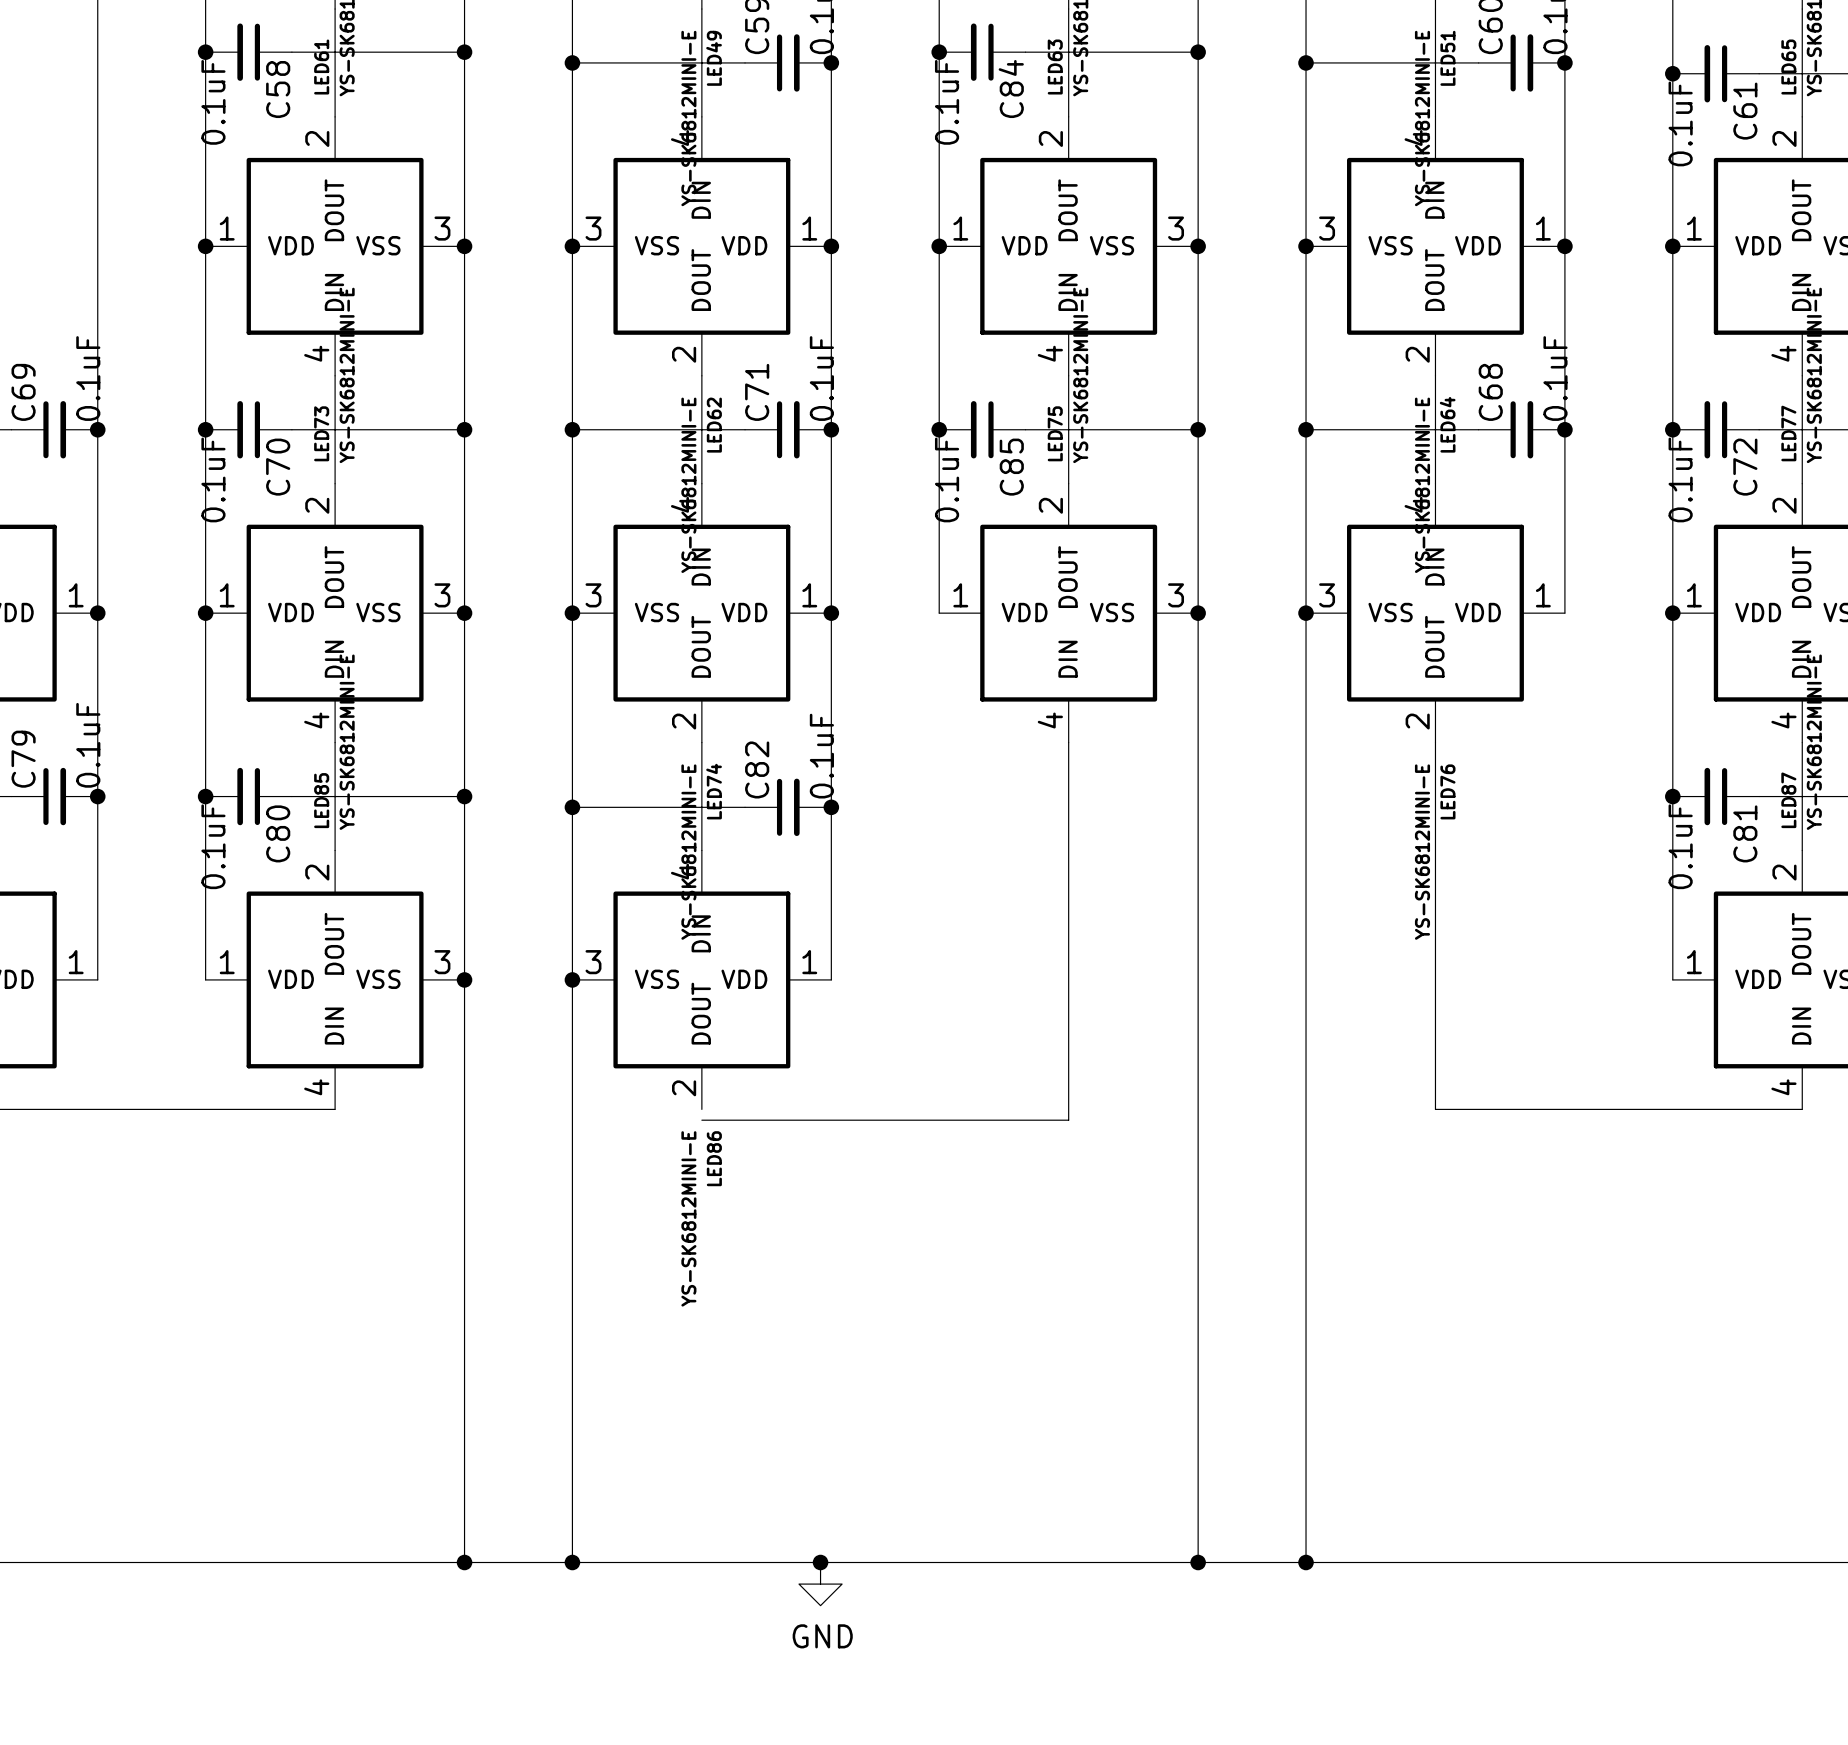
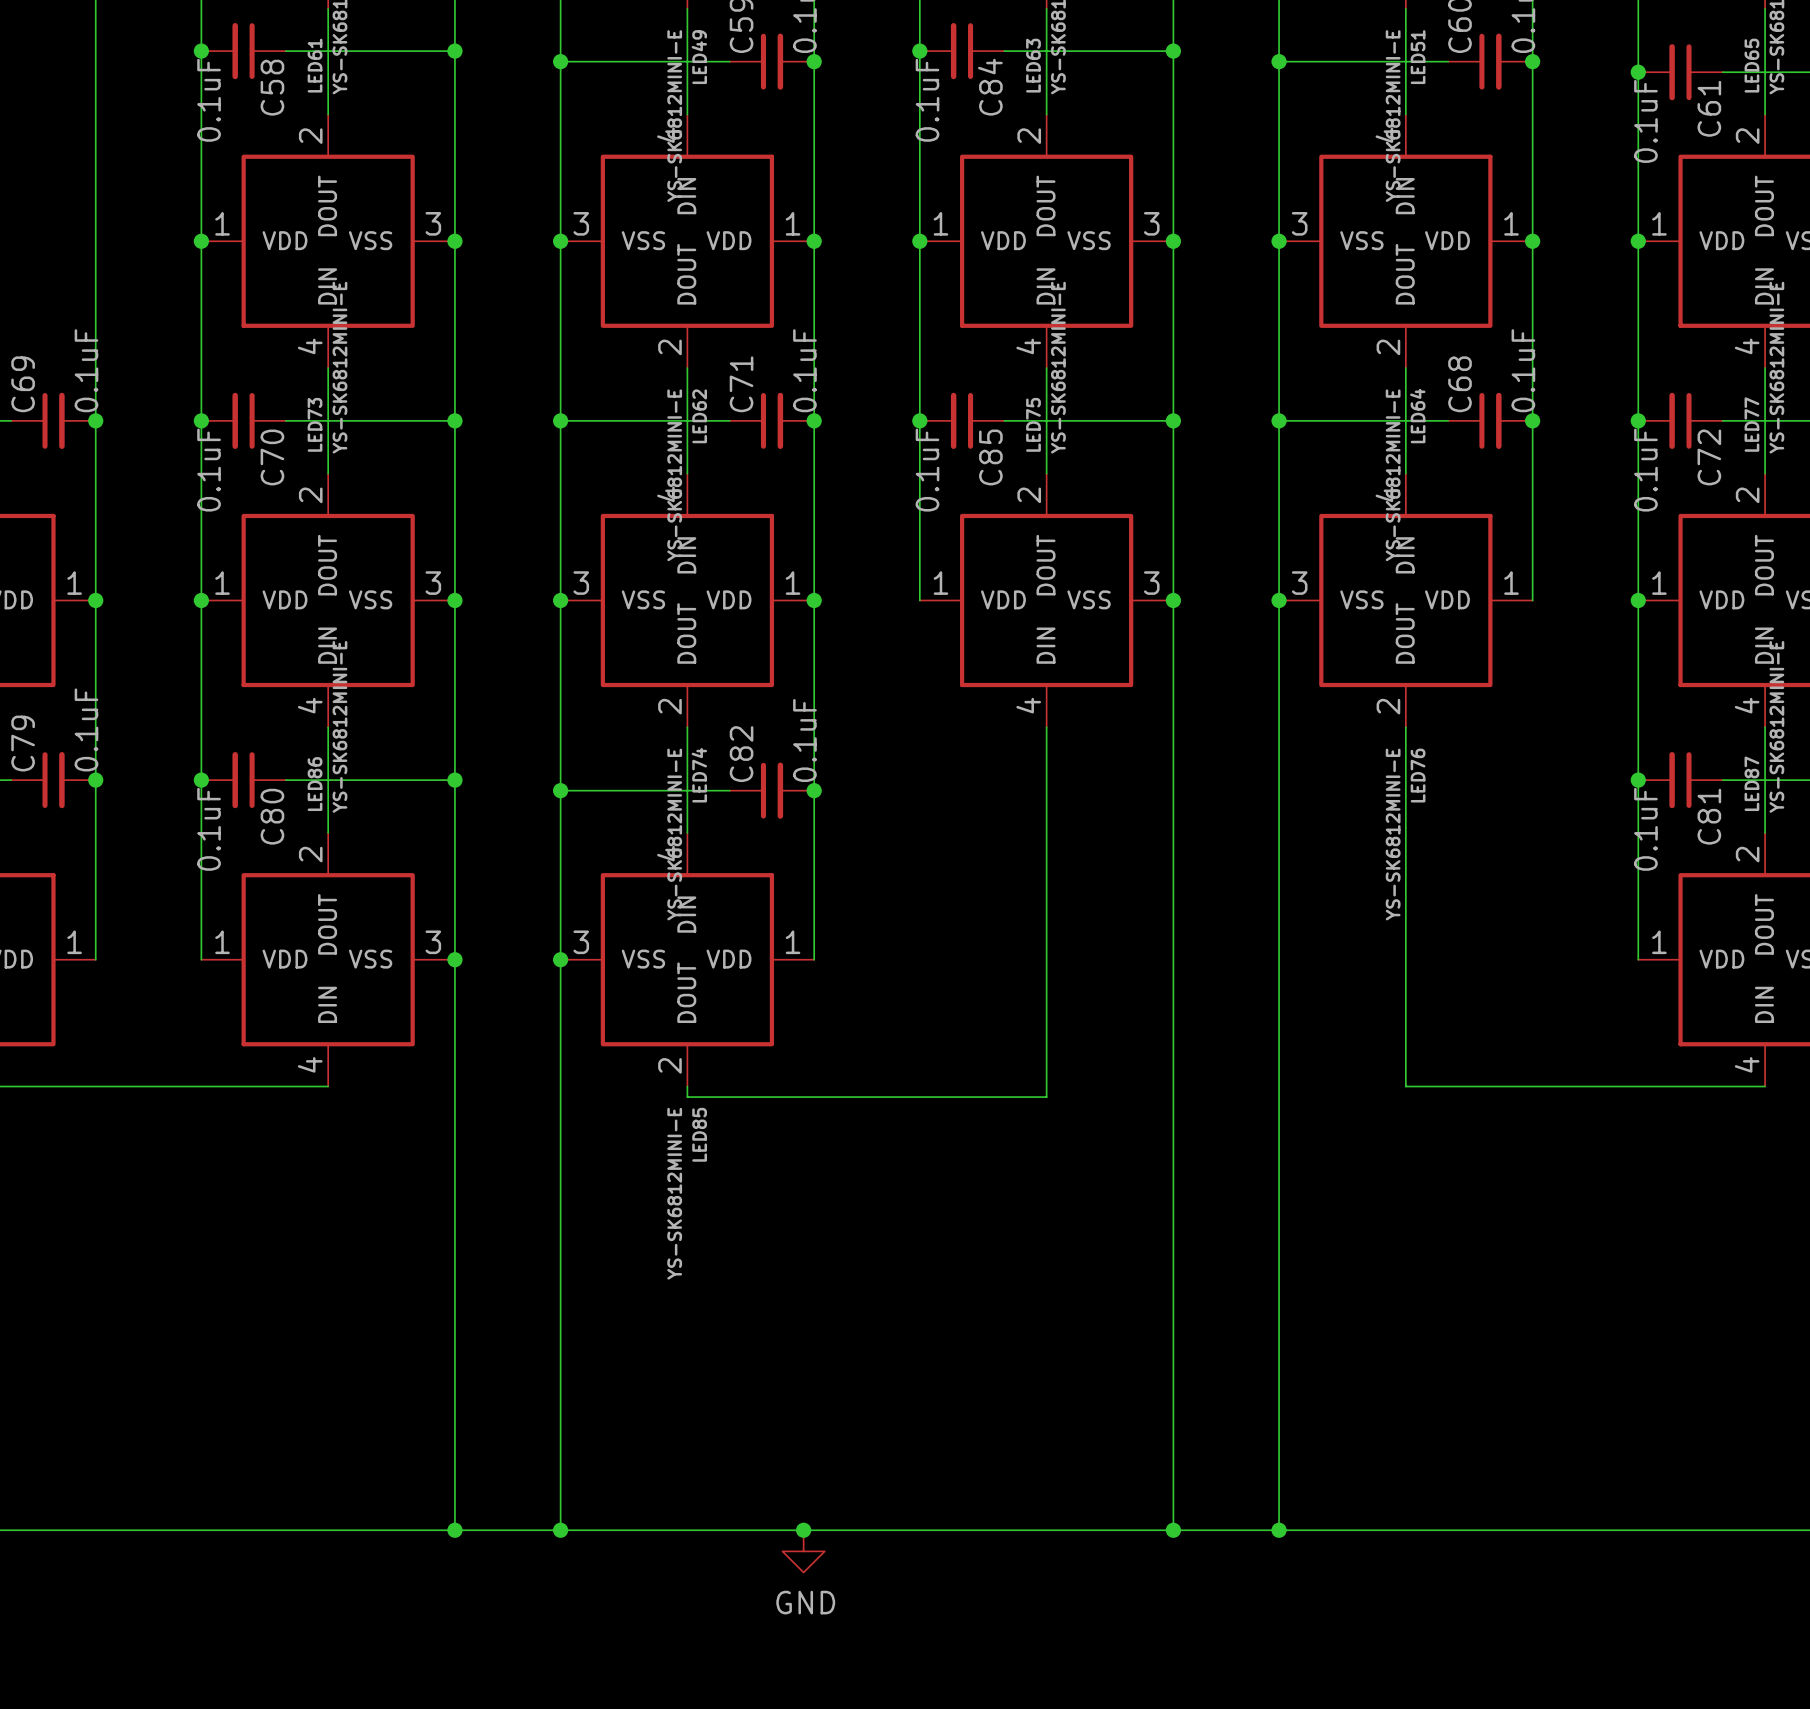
LED85 name: LED85 (321, 800) -> LED86 (315, 784)
wire: none -> (687, 1086) (687, 1097)
LED86 name: LED86 (714, 1158) -> LED85 (699, 1134)

